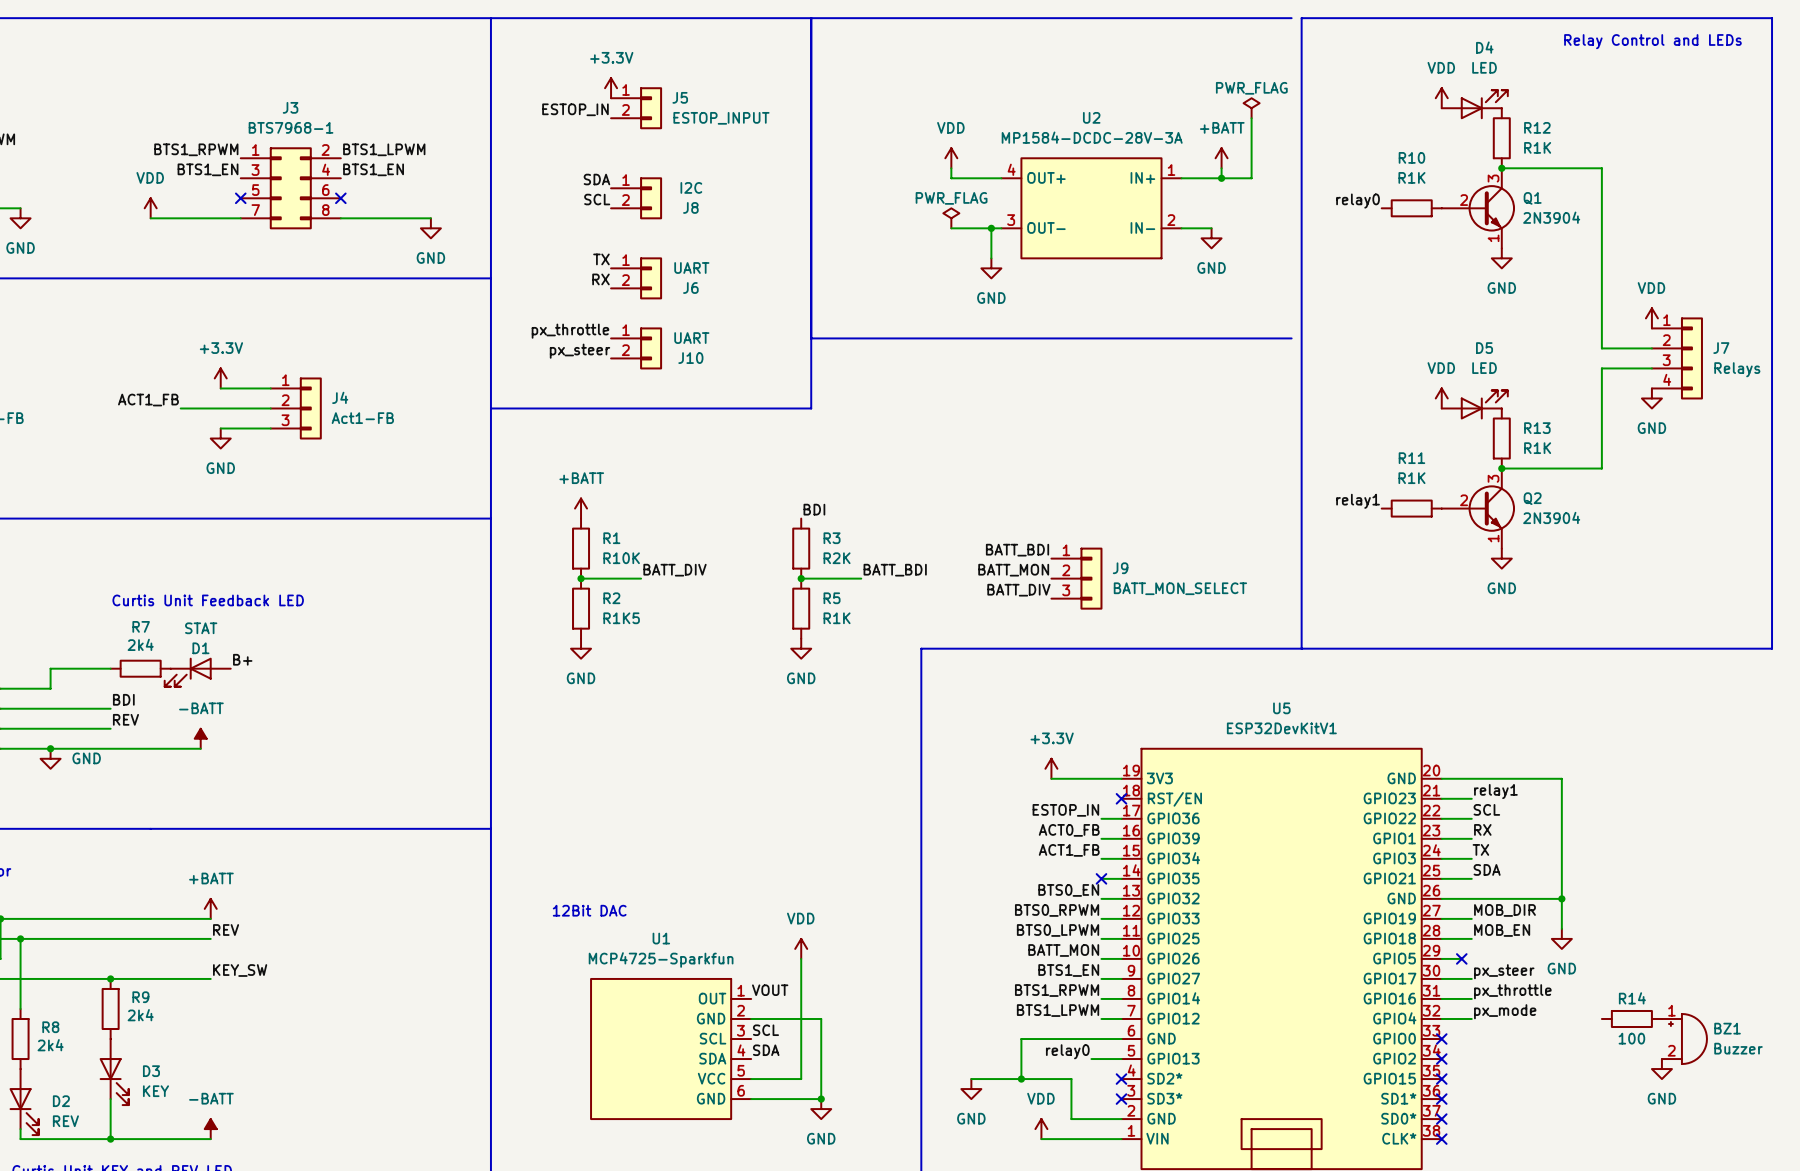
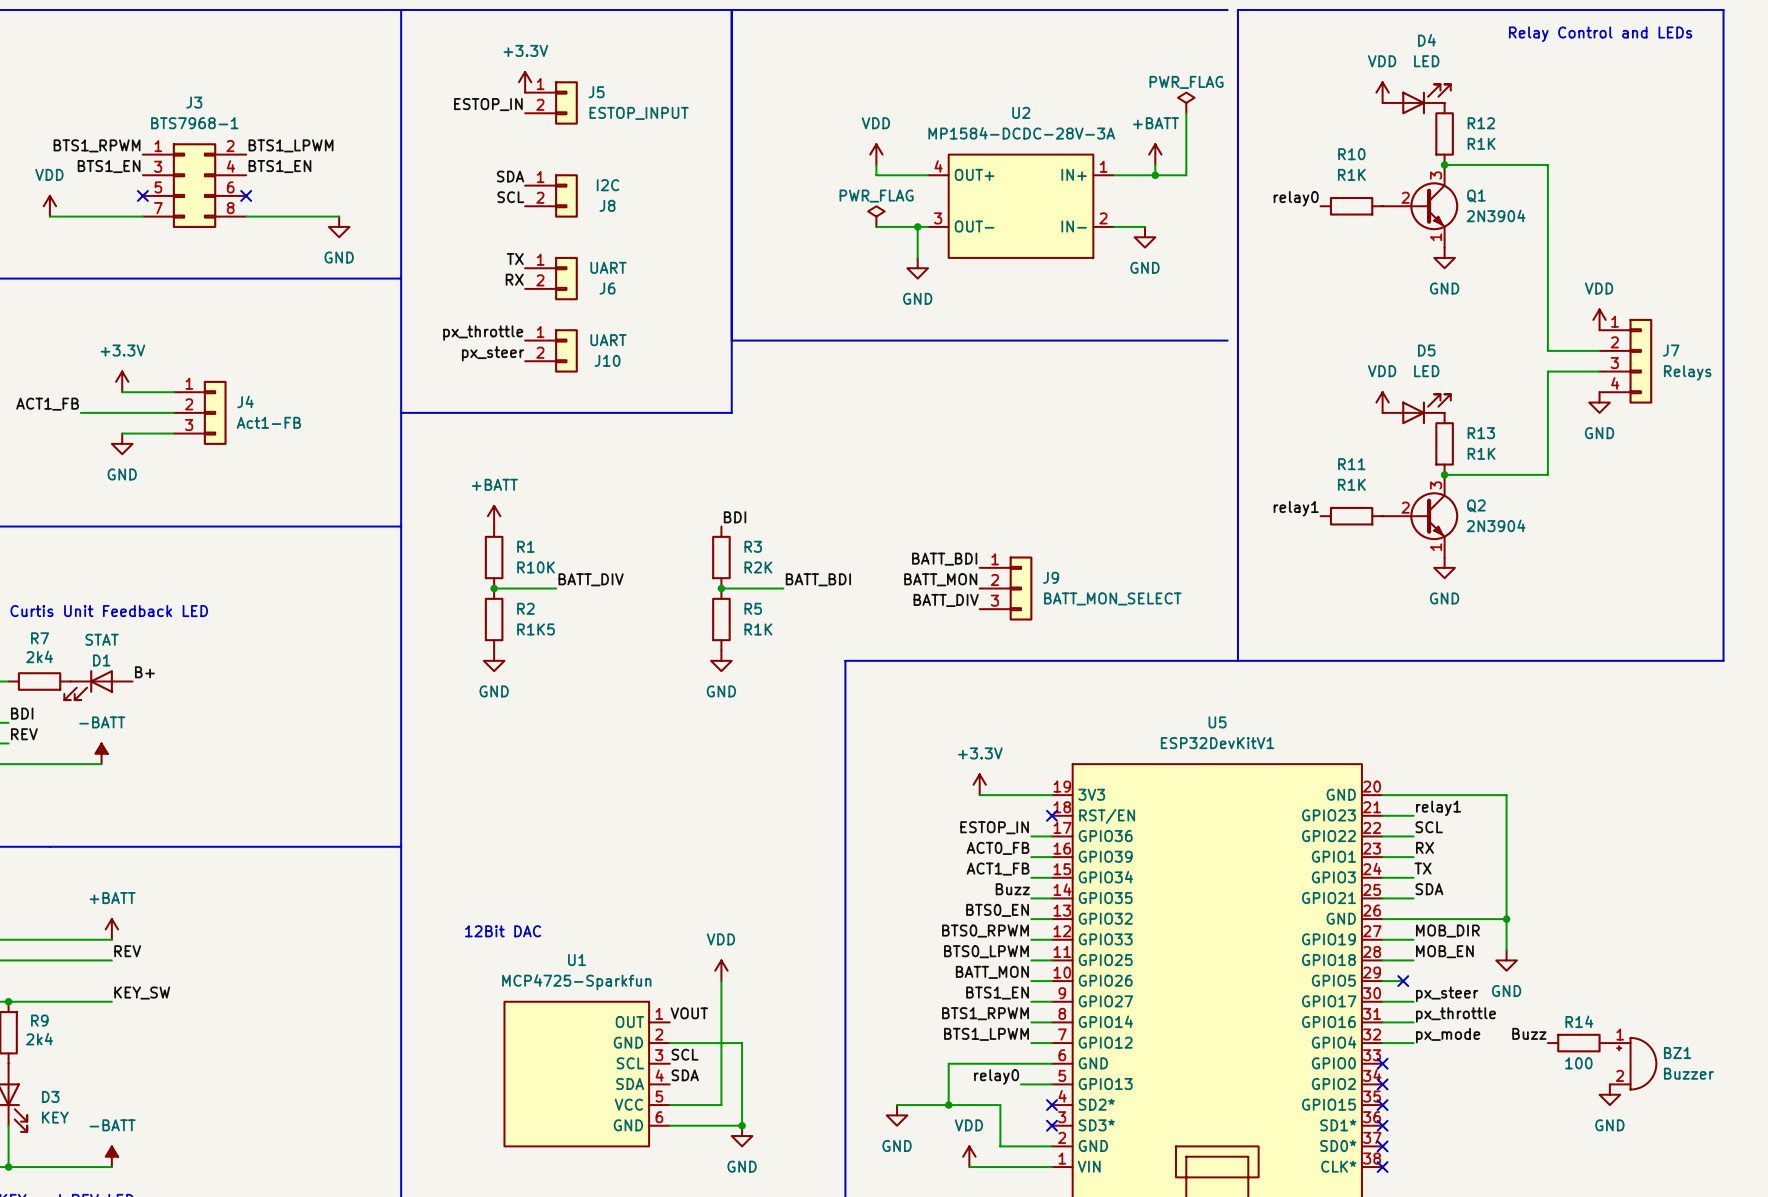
label: none -> Buzz (1012, 889)
no-connect mark: (1101, 878) -> none
label: none -> Buzz (1529, 1033)

